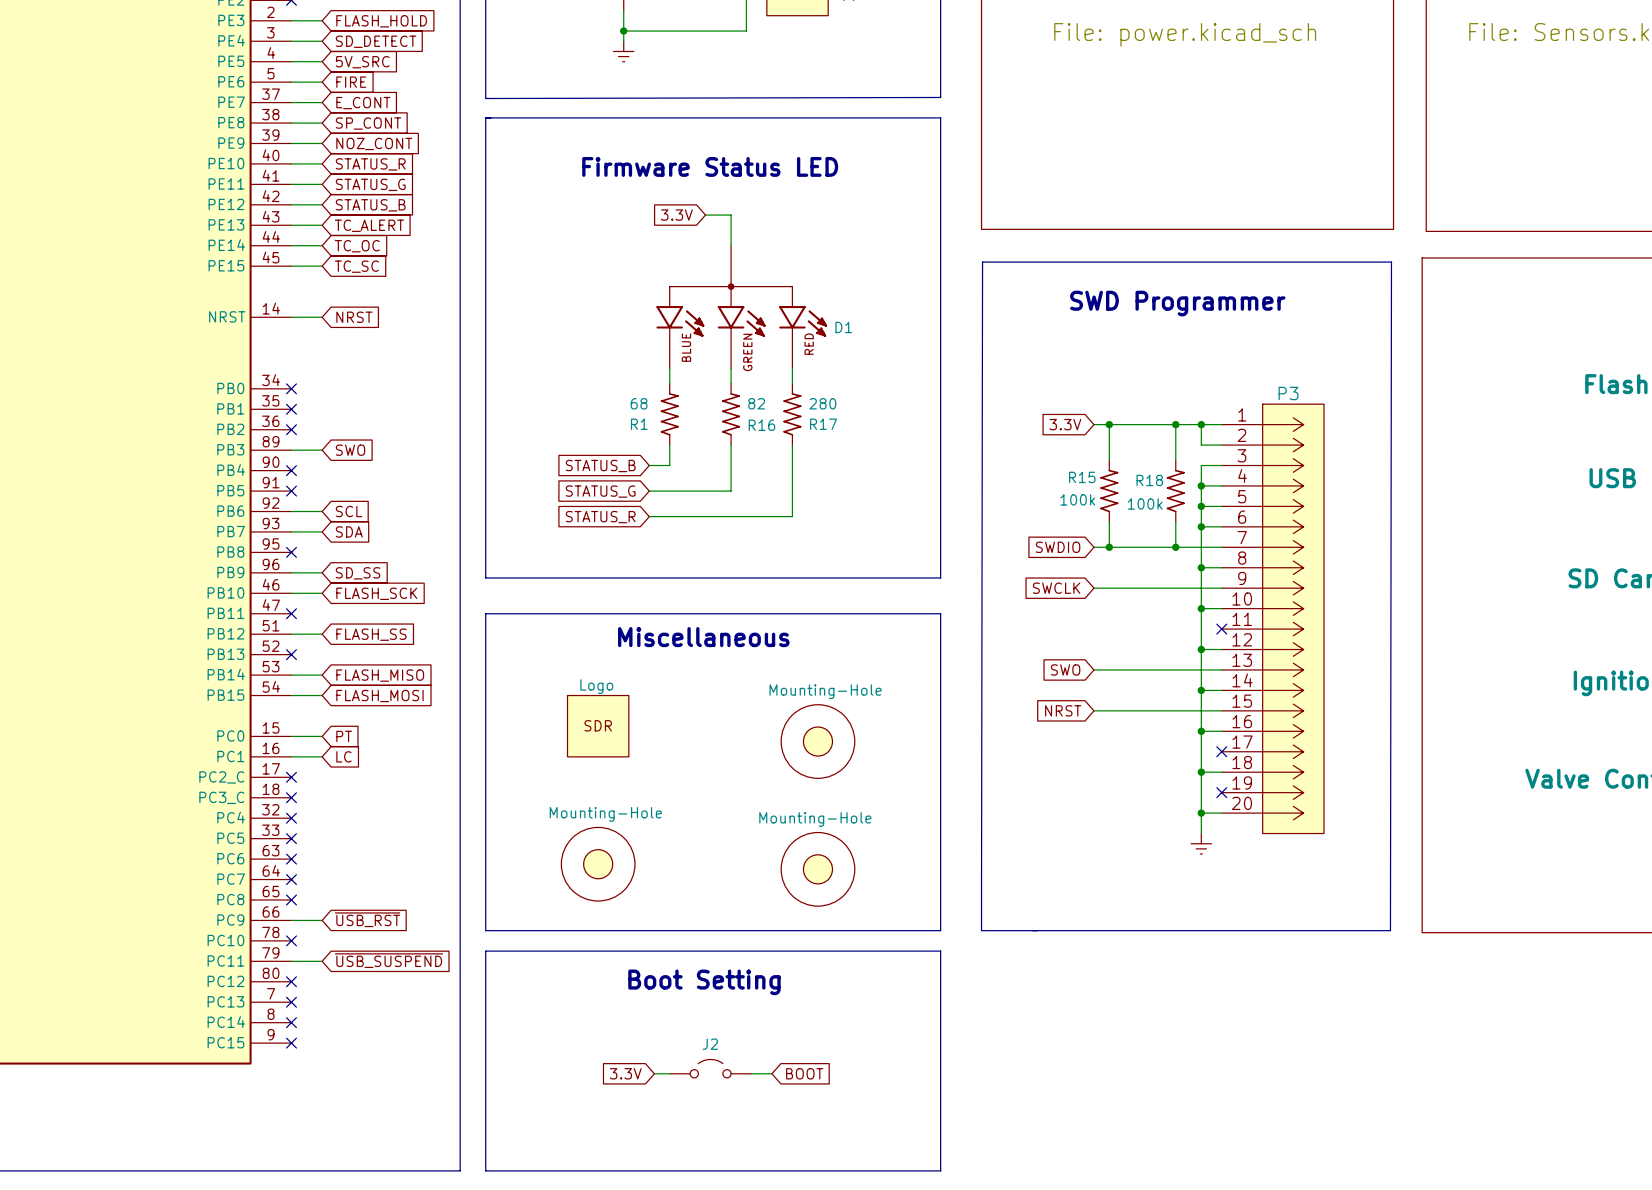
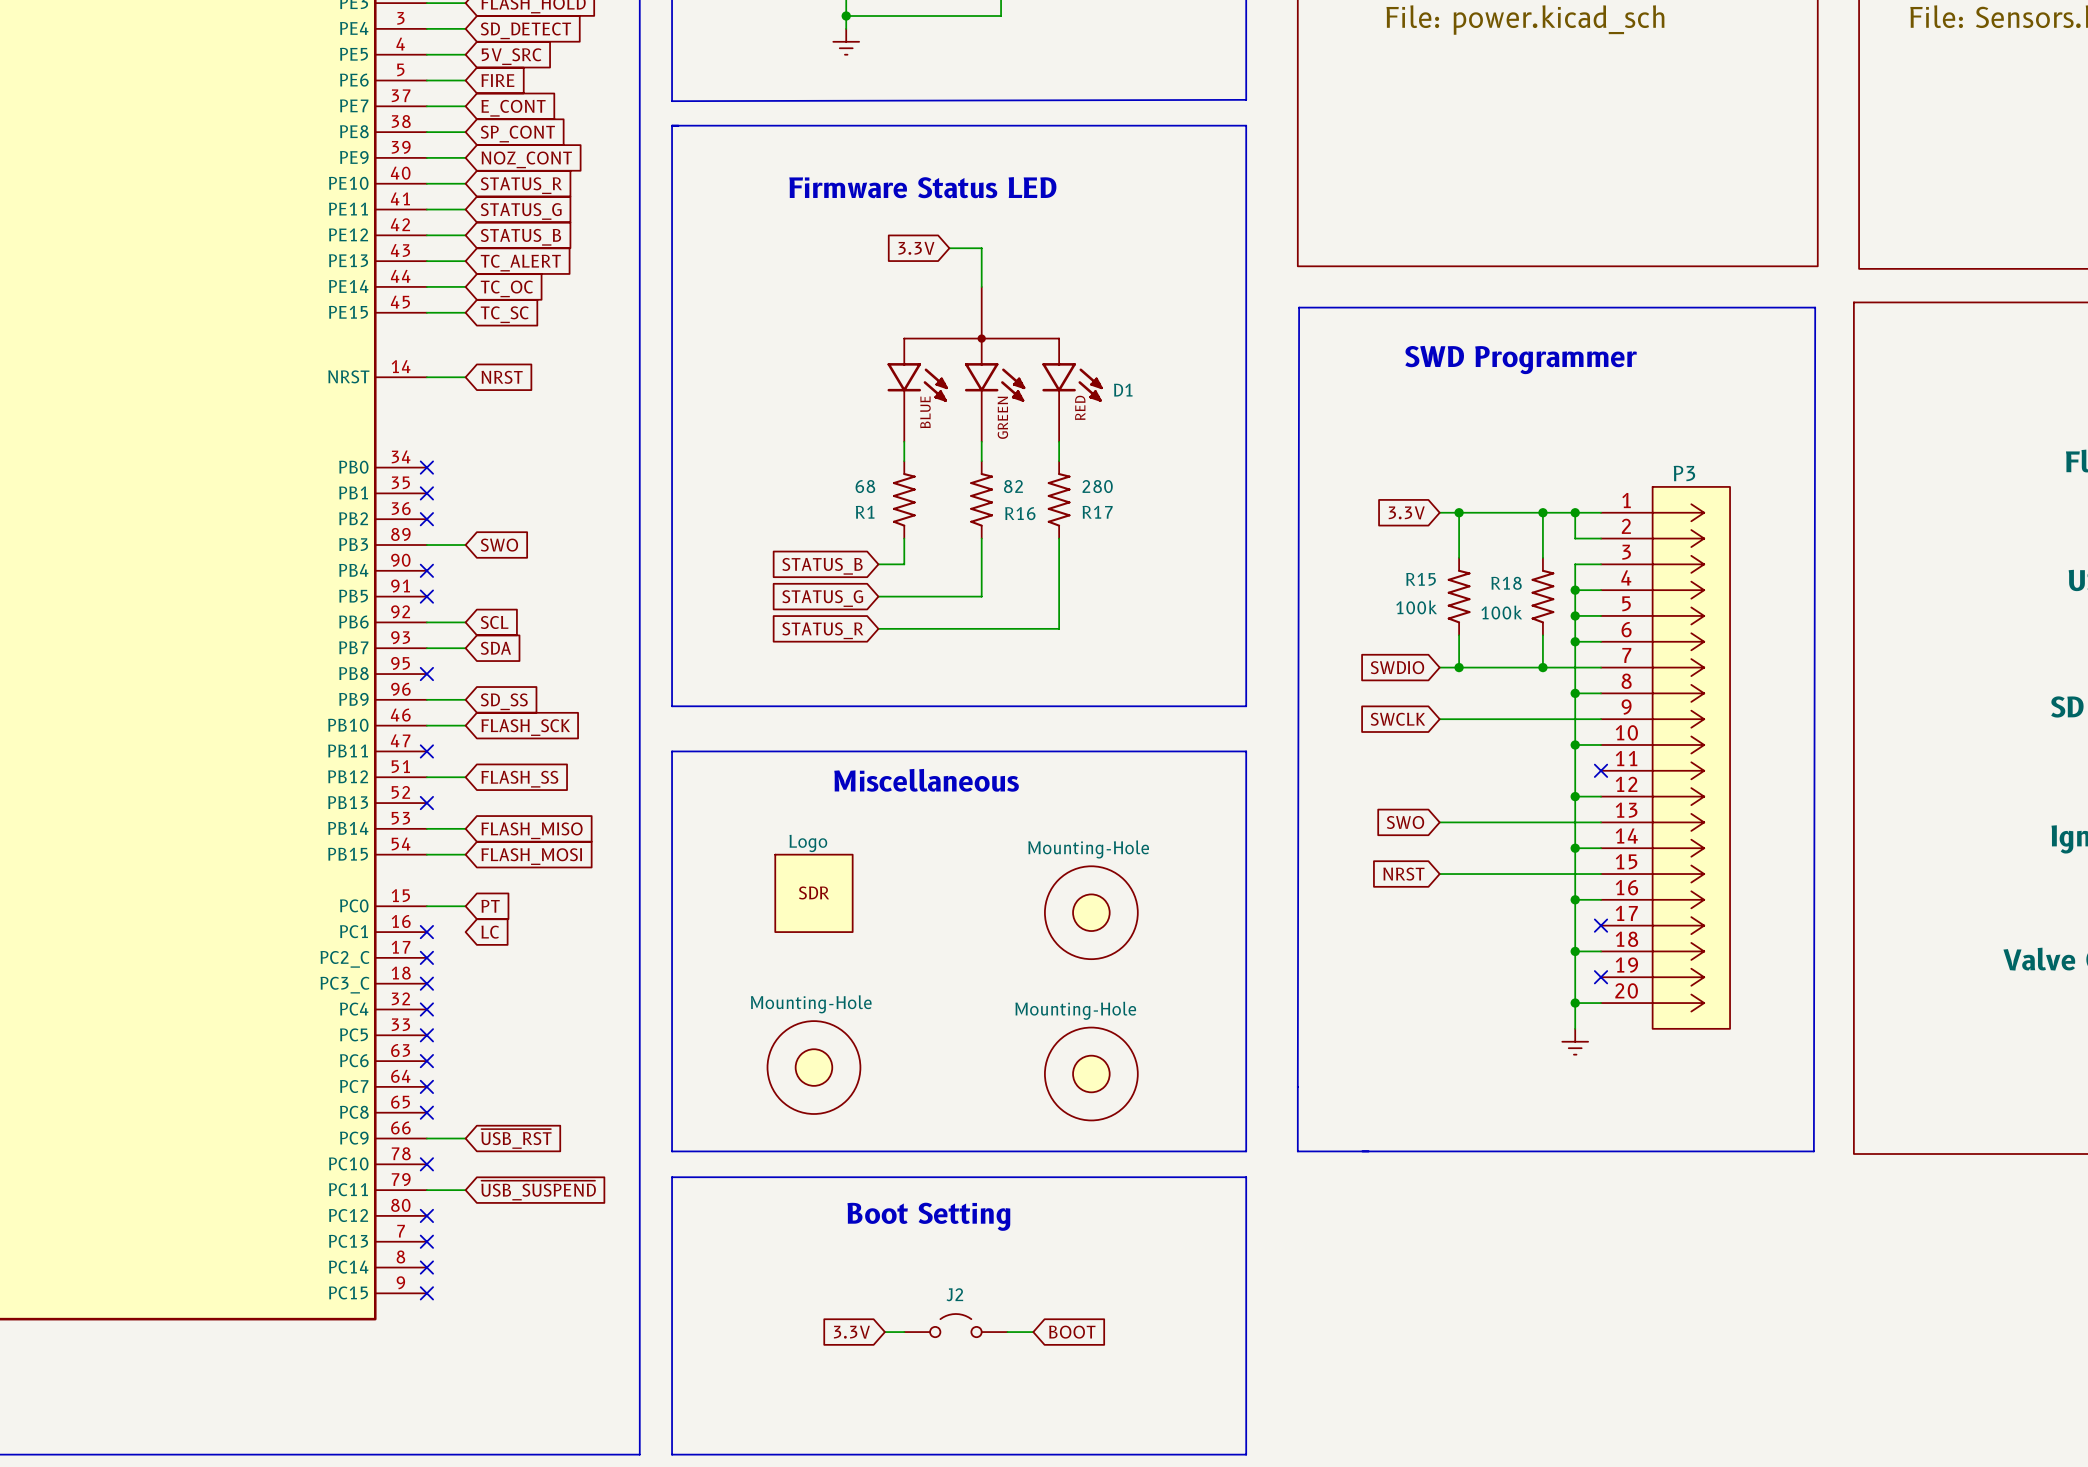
wire: (291, 756) (322, 756) -> none
no-connect mark: none -> (426, 932)

